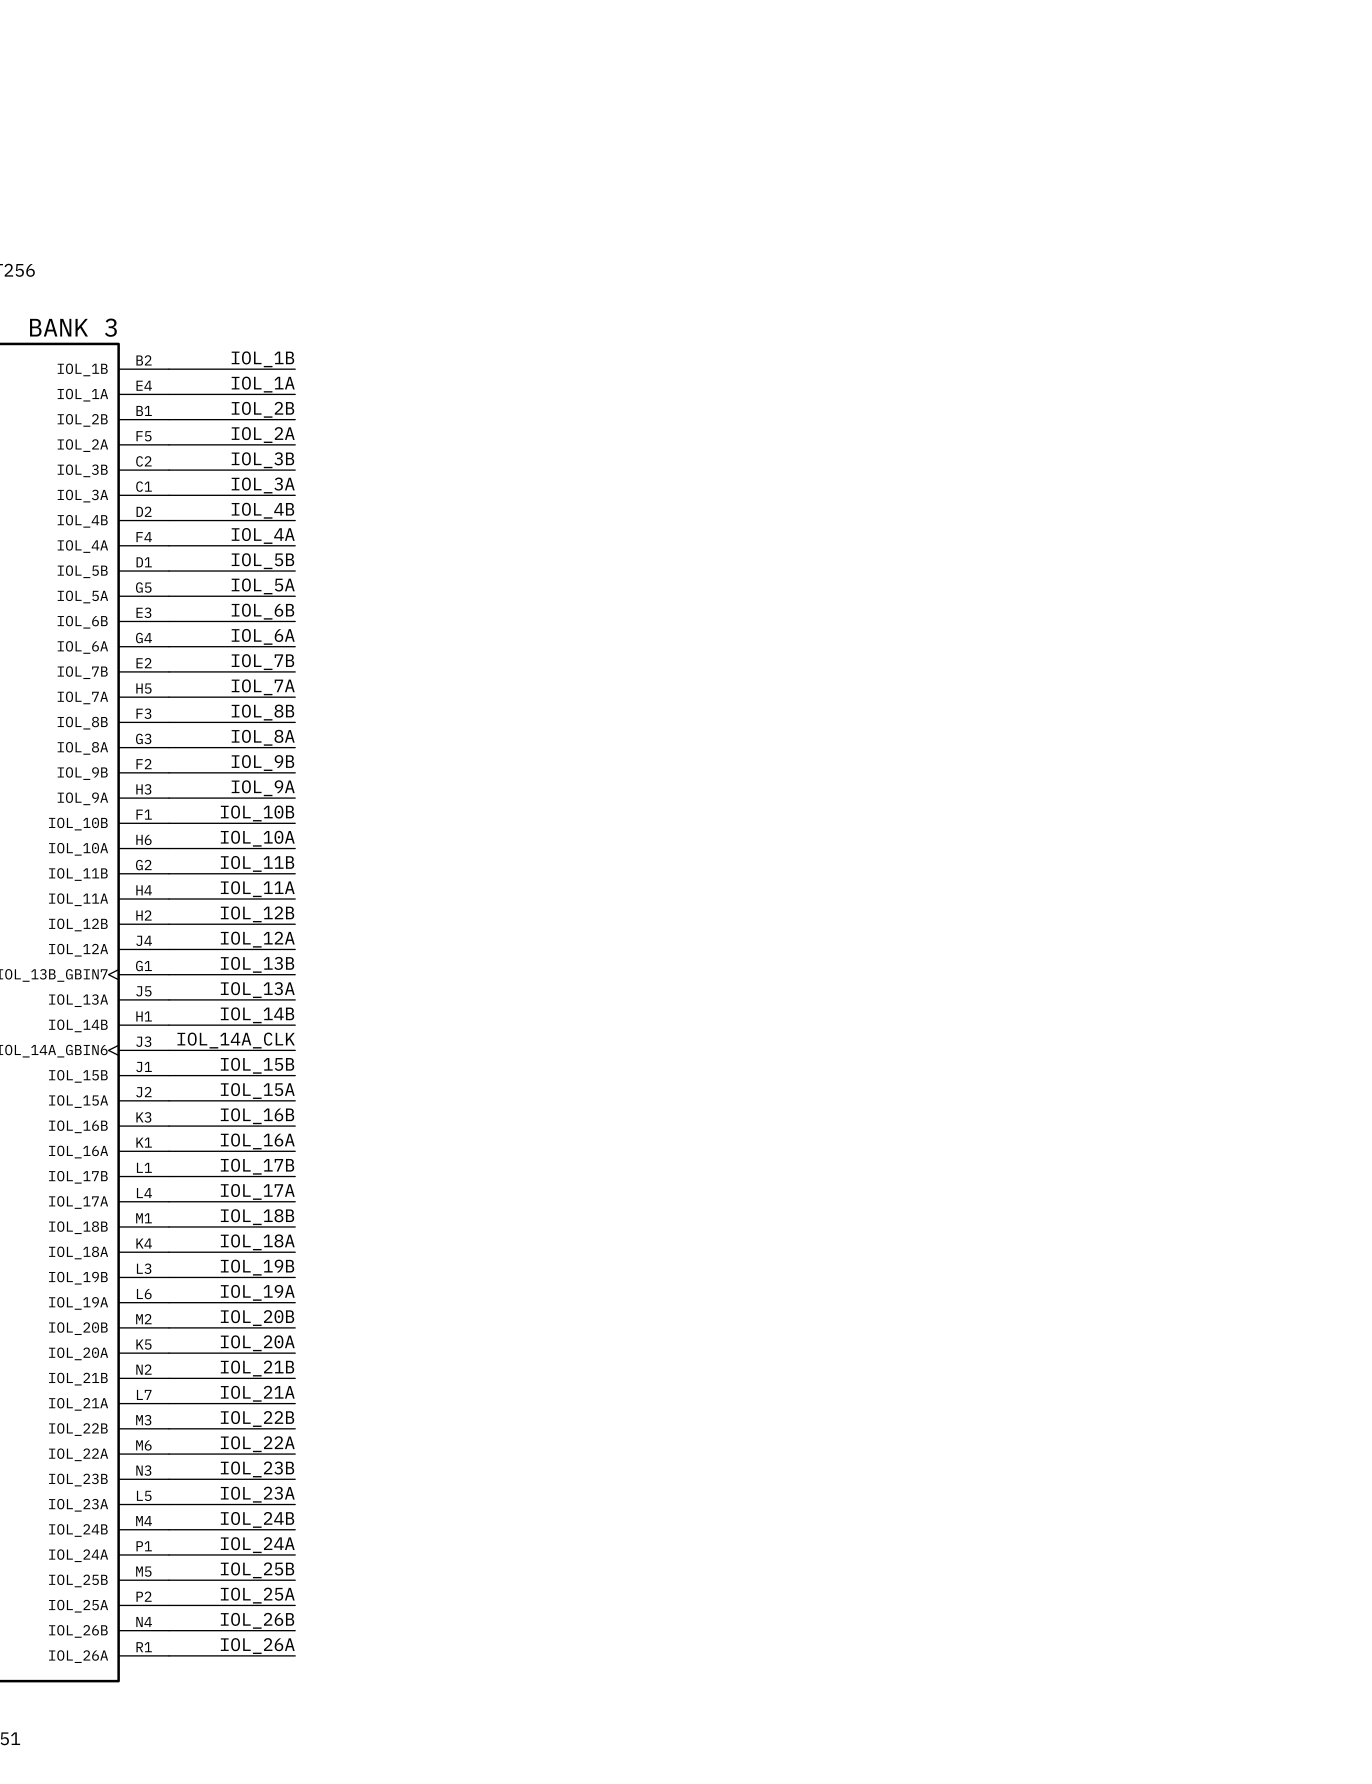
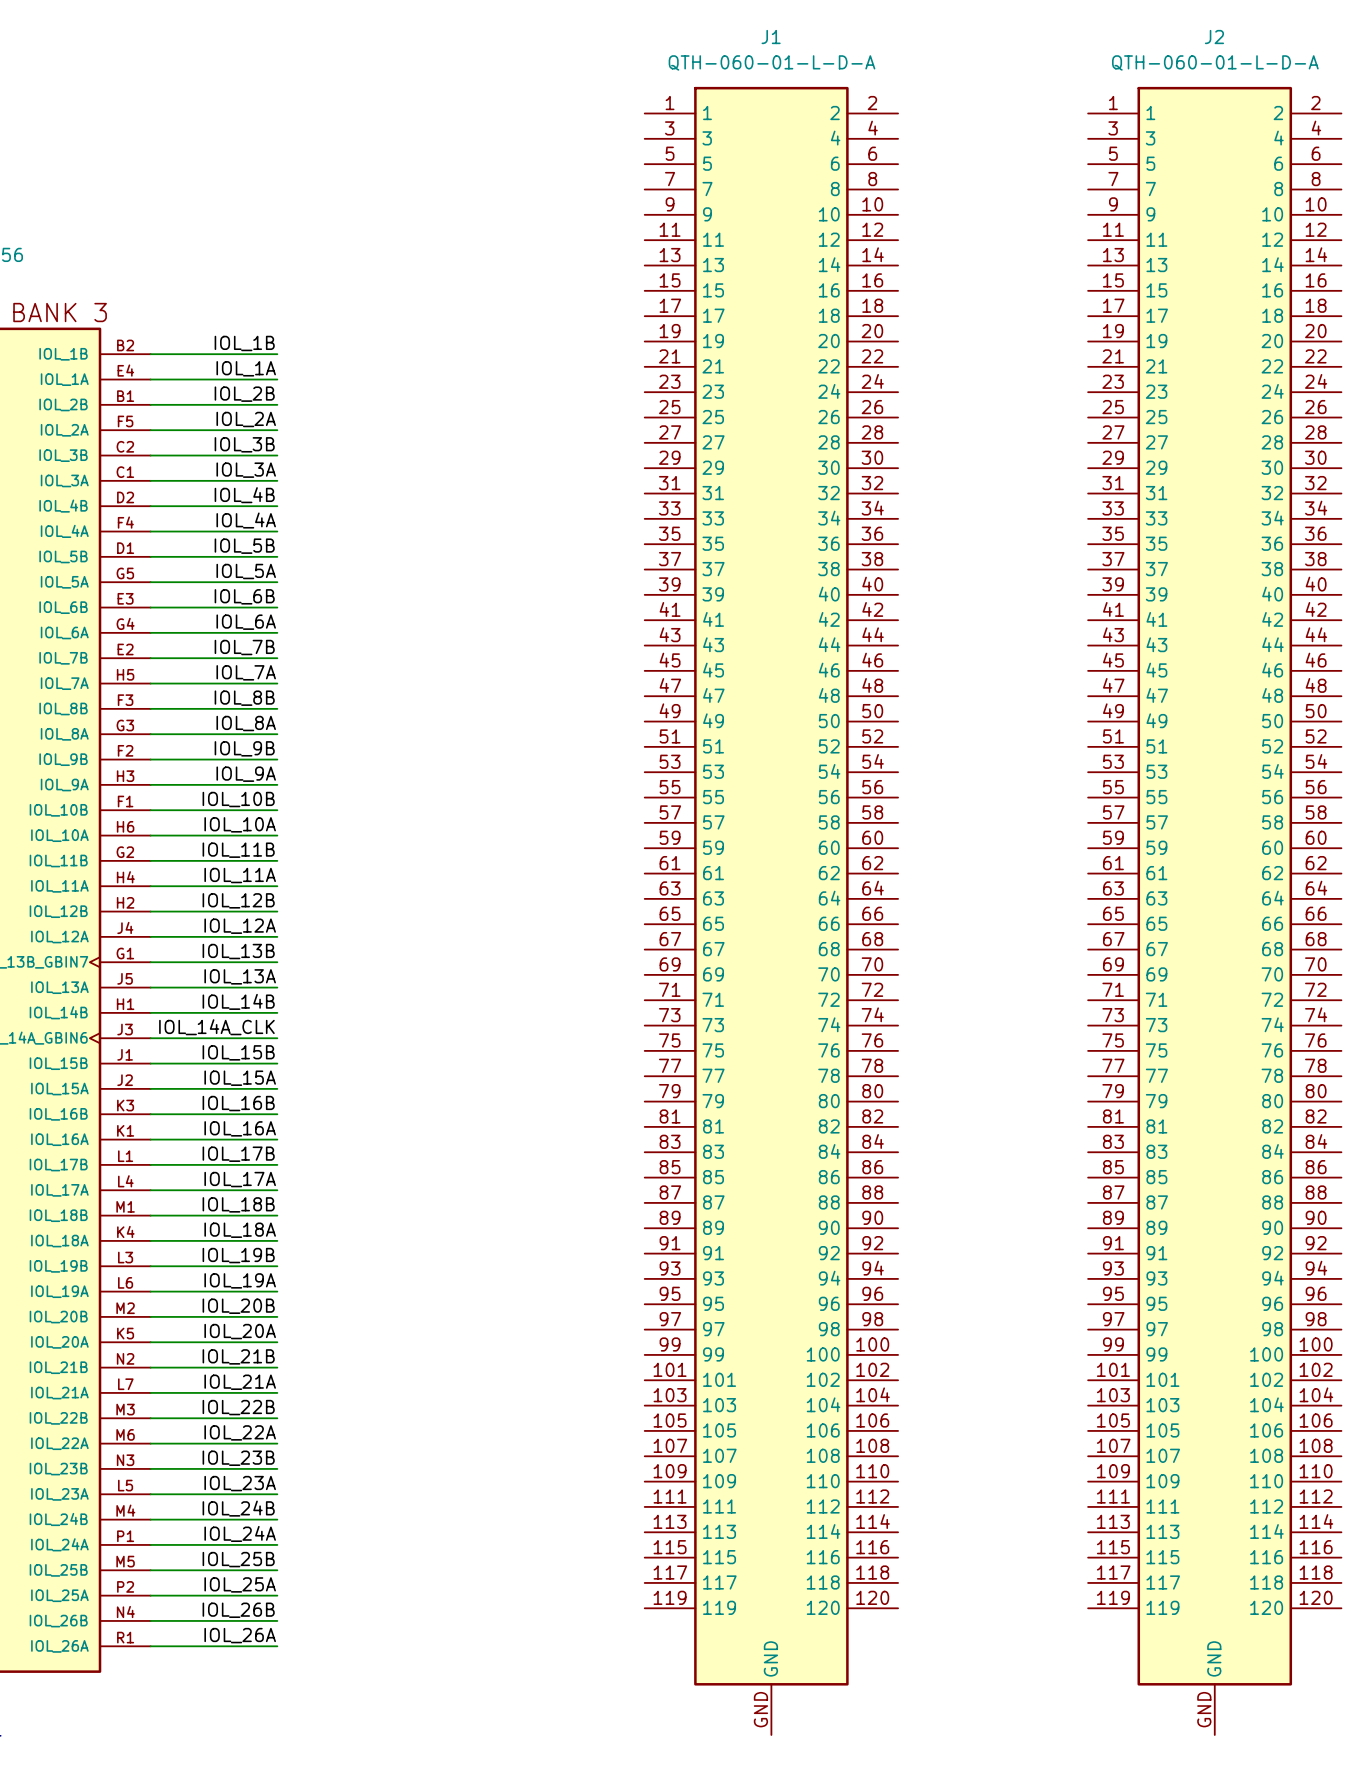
J1: none -> QTH-060-01-L-D-A (771, 910)
J2: none -> QTH-060-01-L-D-A (1214, 910)

